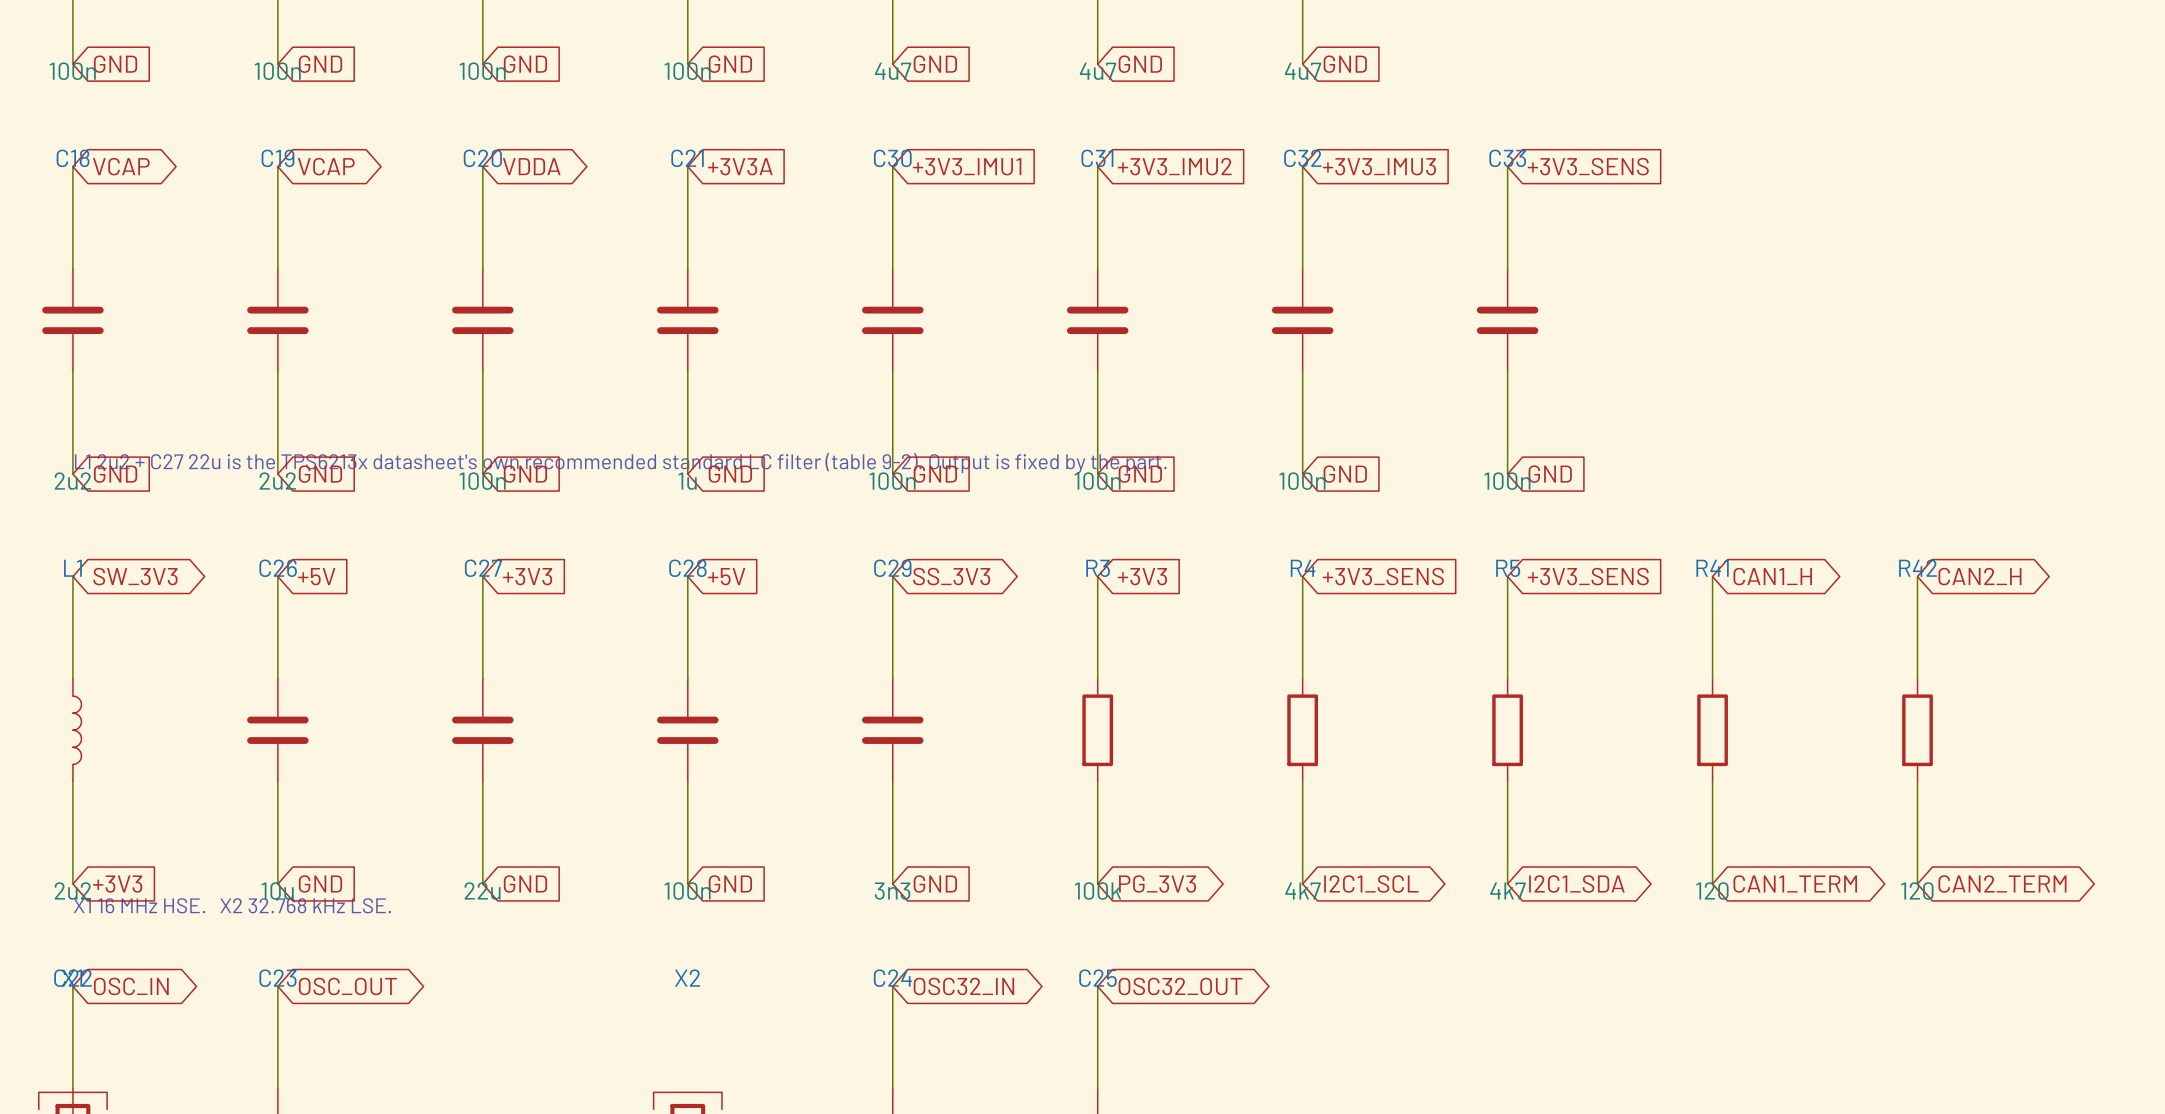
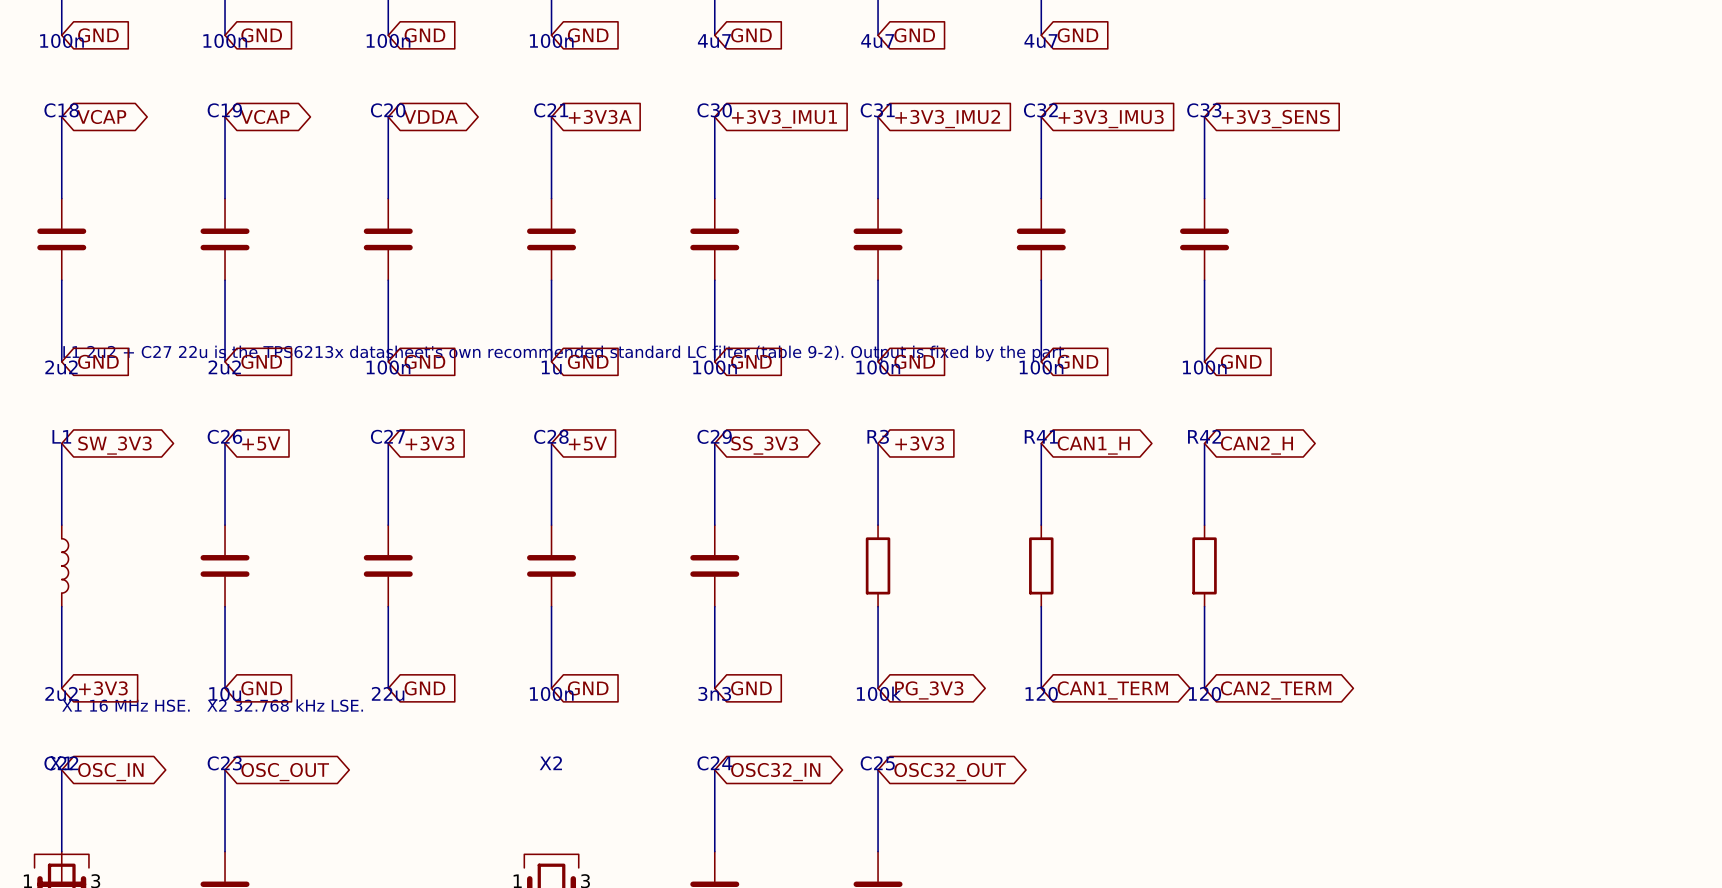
R4 name: R4 (1303, 568) -> R41 (1041, 436)
R5 name: R5 (1508, 568) -> R42 (1204, 436)
global label shape: input (1383, 576) -> bidirectional (1093, 445)
global label: +3V3_SENS (1383, 576) -> CAN1_H (1093, 445)
global label shape: input (1588, 576) -> bidirectional (1256, 445)
global label: +3V3_SENS (1588, 576) -> CAN2_H (1256, 445)
wire: (1712, 576) (1712, 679) -> none
global label: CAN1_H (1772, 576) -> none
wire: (1917, 576) (1917, 679) -> none
global label: CAN2_H (1979, 576) -> none
R41: 120 (1712, 730) -> none
R42: 120 (1917, 730) -> none
wire: (1712, 781) (1712, 883) -> none
wire: (1917, 781) (1917, 883) -> none
global label: I2C1_SCL (1371, 884) -> CAN1_TERM (1112, 690)
global label: I2C1_SDA (1576, 884) -> CAN2_TERM (1276, 690)
global label: CAN1_TERM (1795, 884) -> none
global label: CAN2_TERM (2002, 884) -> none
R4 value: 4k7 (1302, 891) -> 120 (1041, 693)
R5 value: 4k7 (1507, 891) -> 120 (1204, 693)

